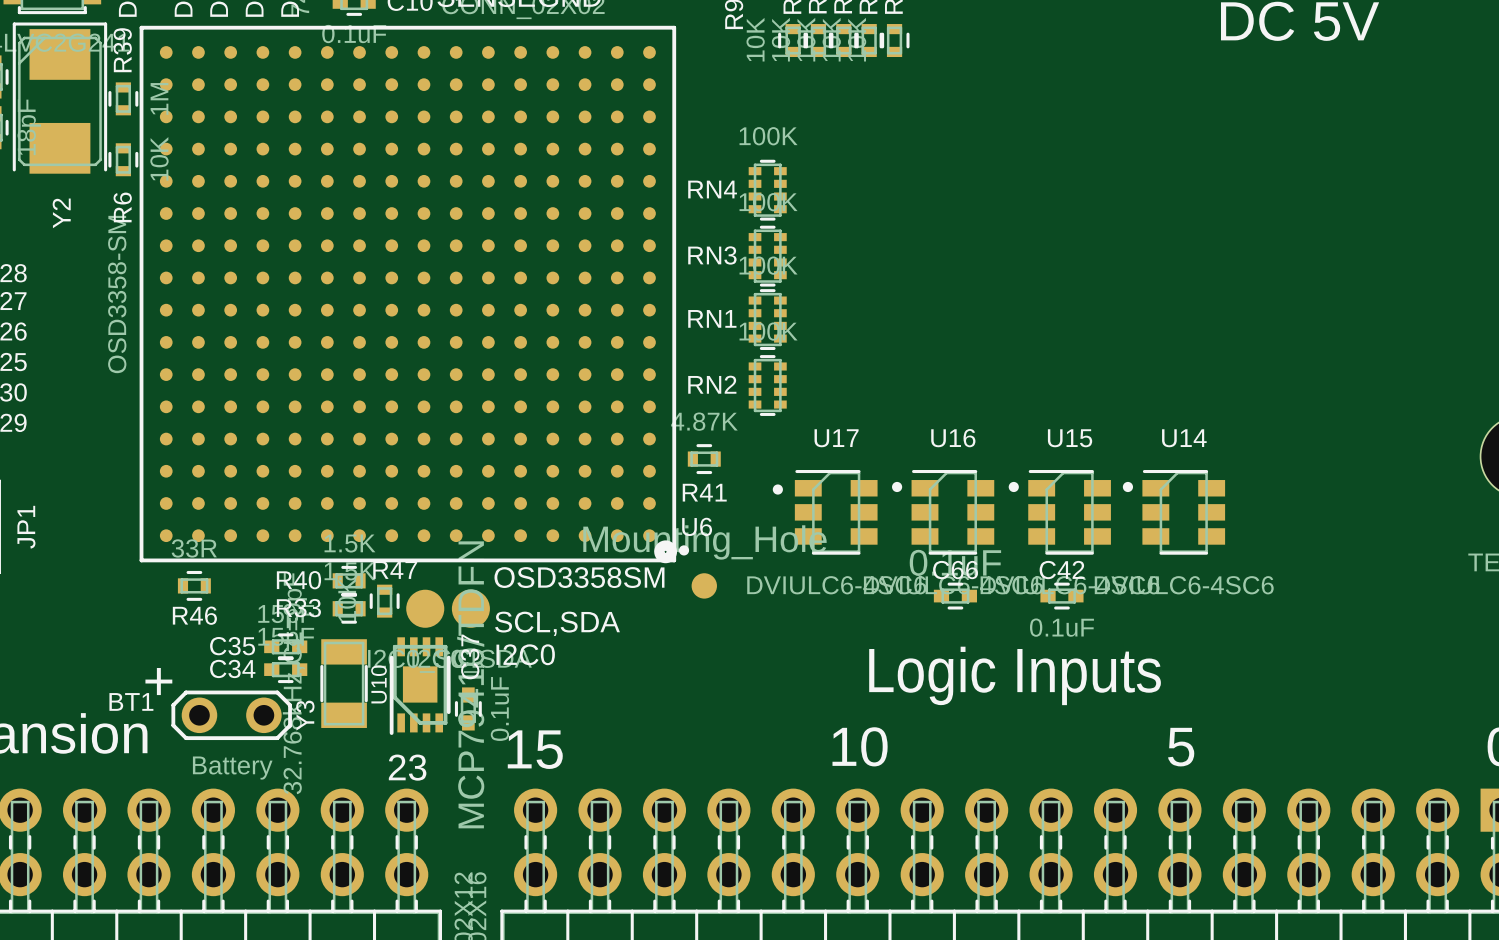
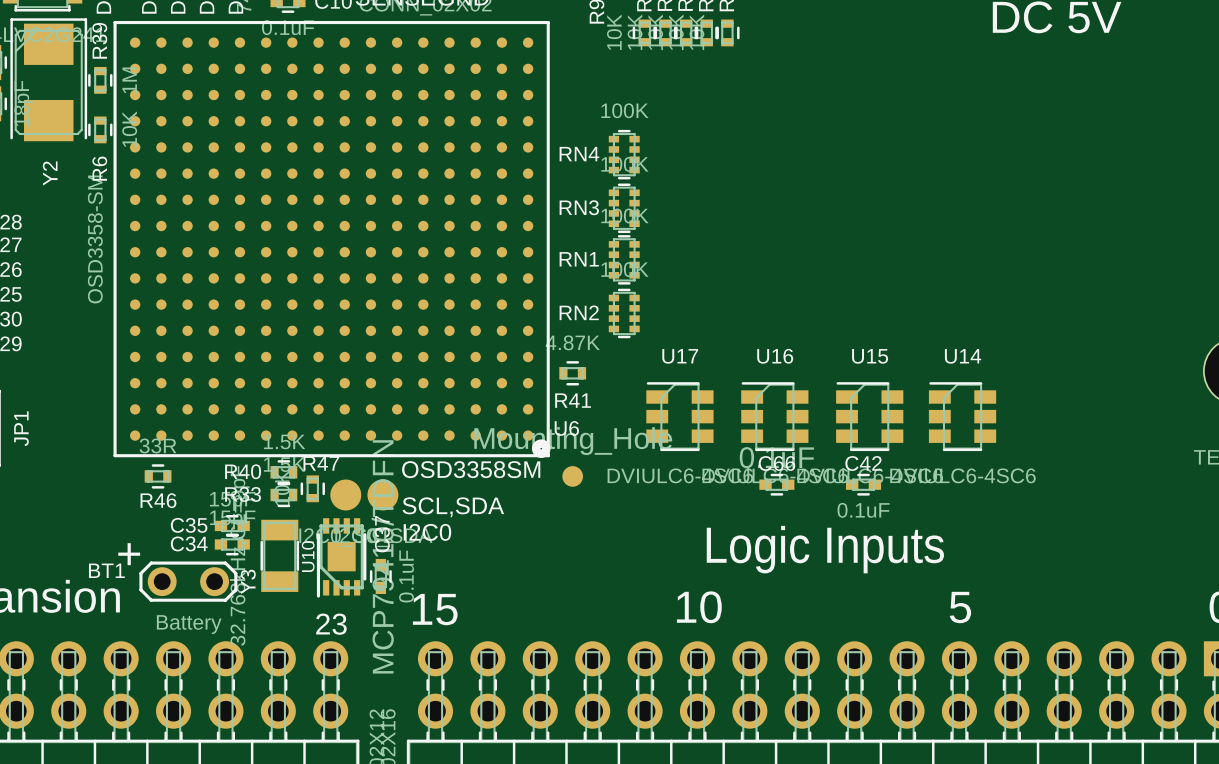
drawing: [892, 481, 903, 493] -> none
drawing: [1008, 481, 1019, 493] -> none
drawing: [1122, 481, 1134, 493] -> none
drawing: [772, 484, 783, 495] -> none
drawing: [678, 545, 690, 556] -> none

